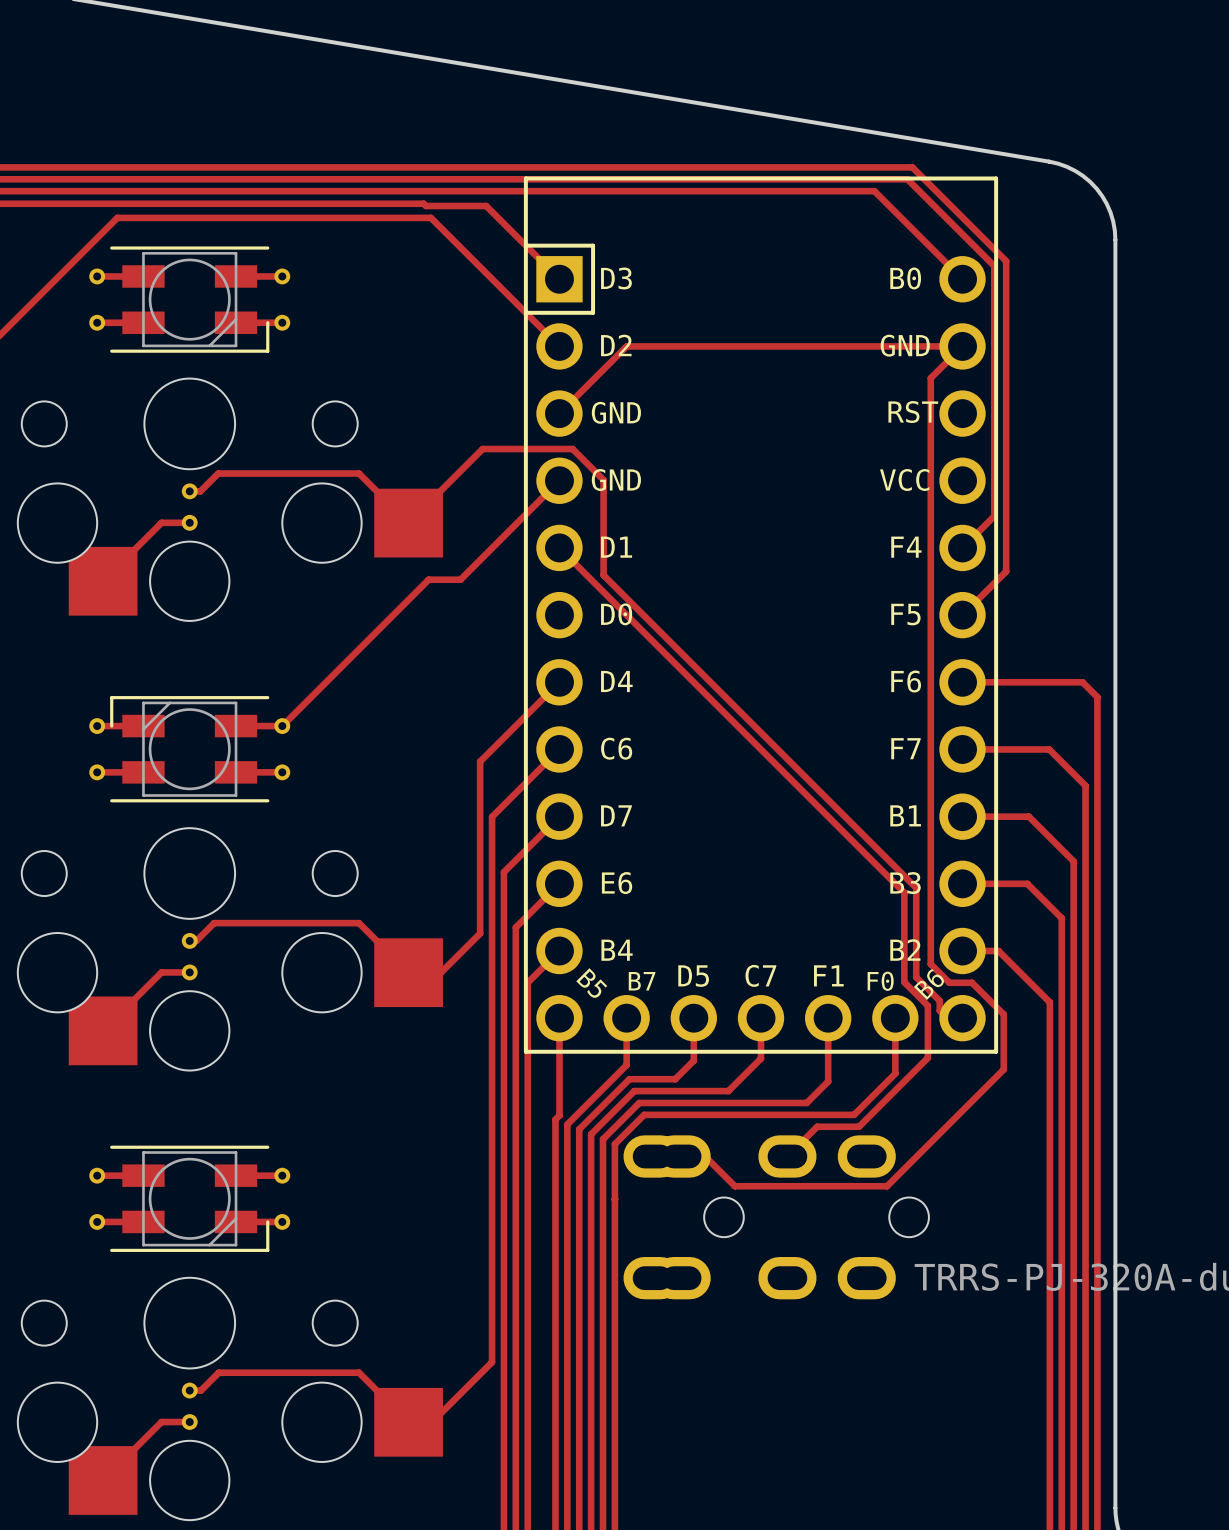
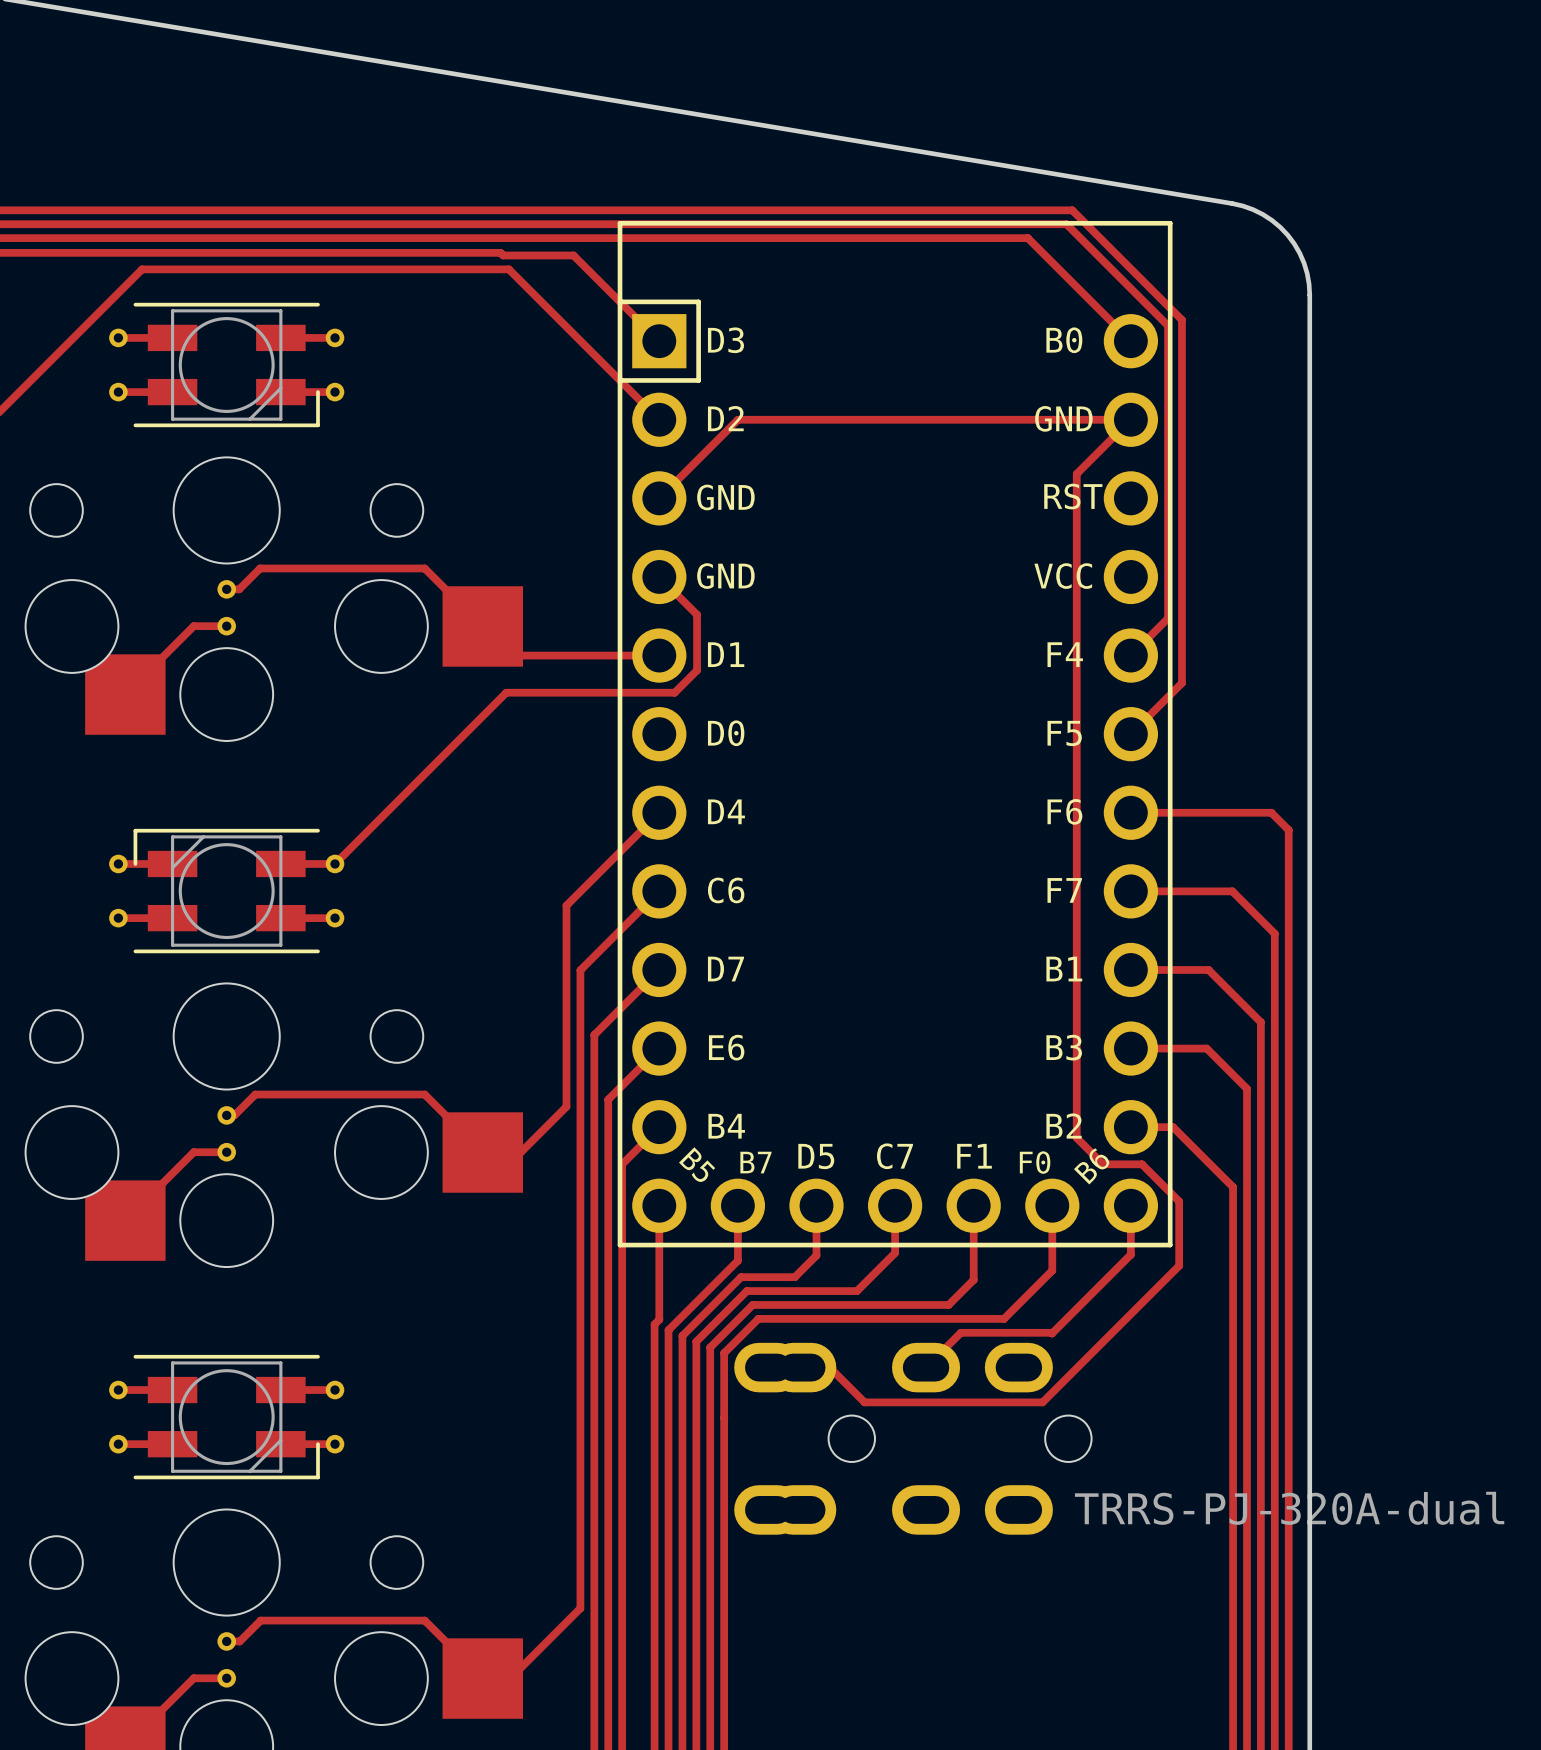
track: (930, 378) (930, 964) (949, 982) -> (1093, 456) (1076, 473) (1076, 1053)
track: (559, 480) (460, 579) -> (659, 576) (697, 614) (697, 670) (674, 692) (543, 692)
track: (408, 523) (482, 449) (572, 449) (603, 479) (603, 575) (916, 887) -> none
track: none -> (511, 655) (659, 655)
track: (559, 547) (904, 892) (904, 982) (927, 1005) (927, 1057) (859, 1126) -> (1130, 1205) (1130, 1254) (1051, 1333) (1009, 1332)
track: (916, 960) (916, 977) (939, 1000) (939, 1010) (947, 1018) (962, 1018) -> (1076, 1137) (1103, 1164) (1115, 1164)

